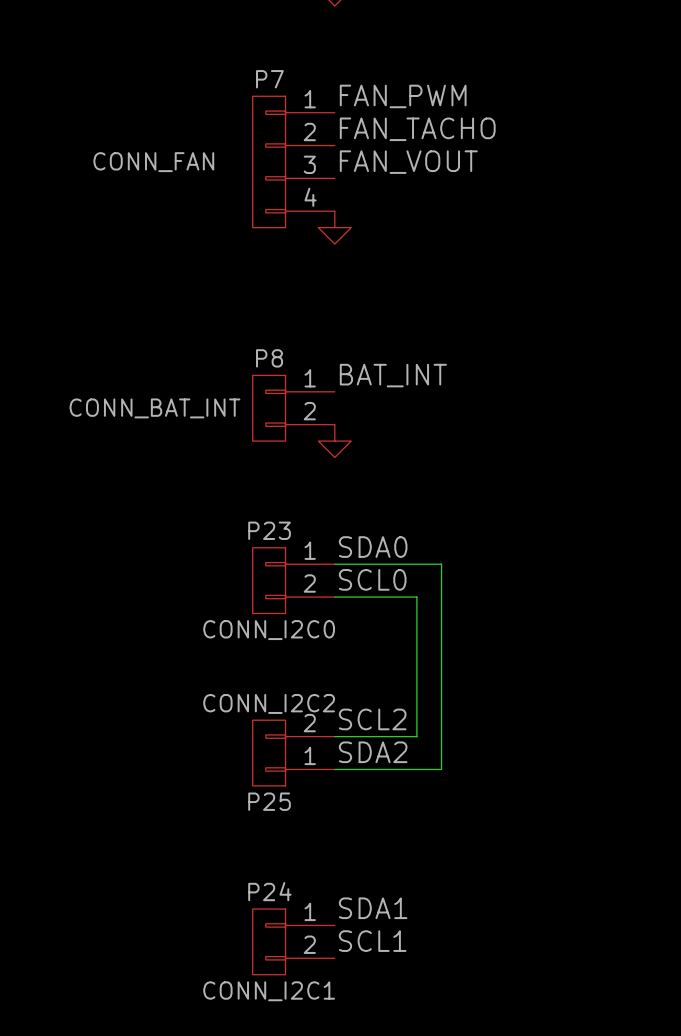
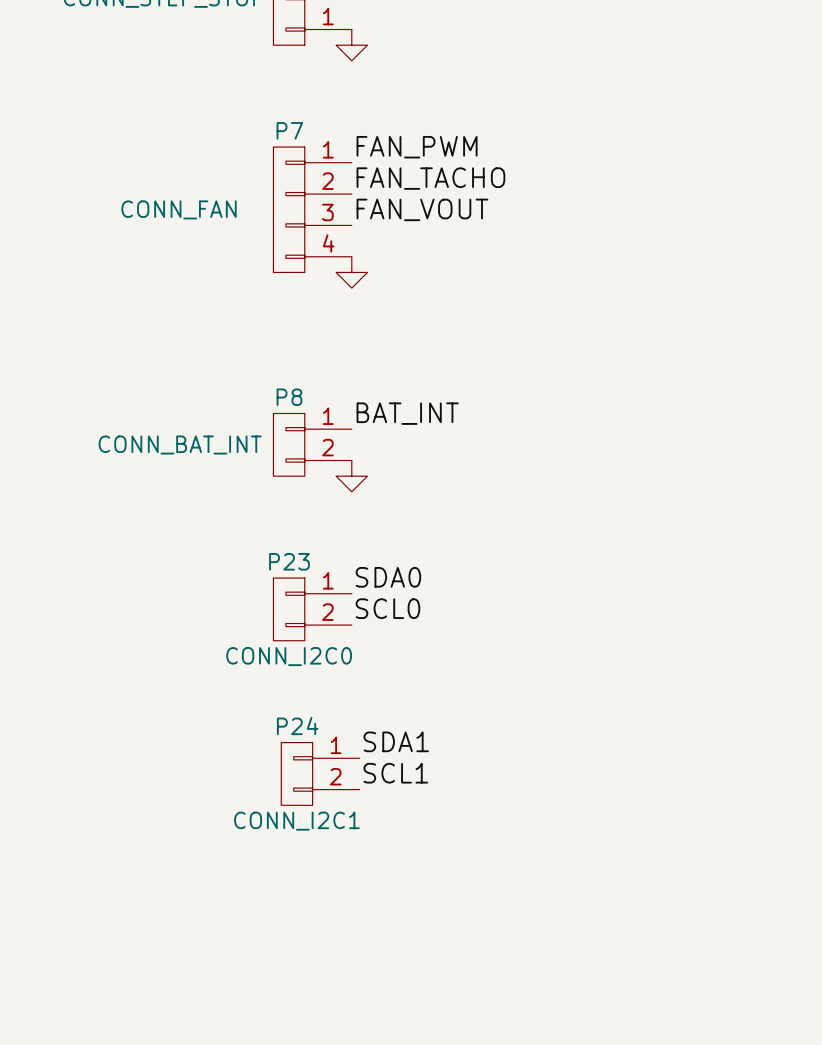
wire: (334, 564) (441, 564) (441, 769) (334, 769) -> none
wire: (334, 597) (416, 597) (416, 736) (334, 736) -> none
label: SCL2 (372, 719) -> SDA1 (396, 741)
label: SDA2 (373, 752) -> SCL1 (395, 773)
P25: CONN_I2C2 (293, 753) -> none
label: SDA1 (373, 908) -> none
P24 position: (293, 941) -> (320, 773)
label: SCL1 (372, 941) -> none

